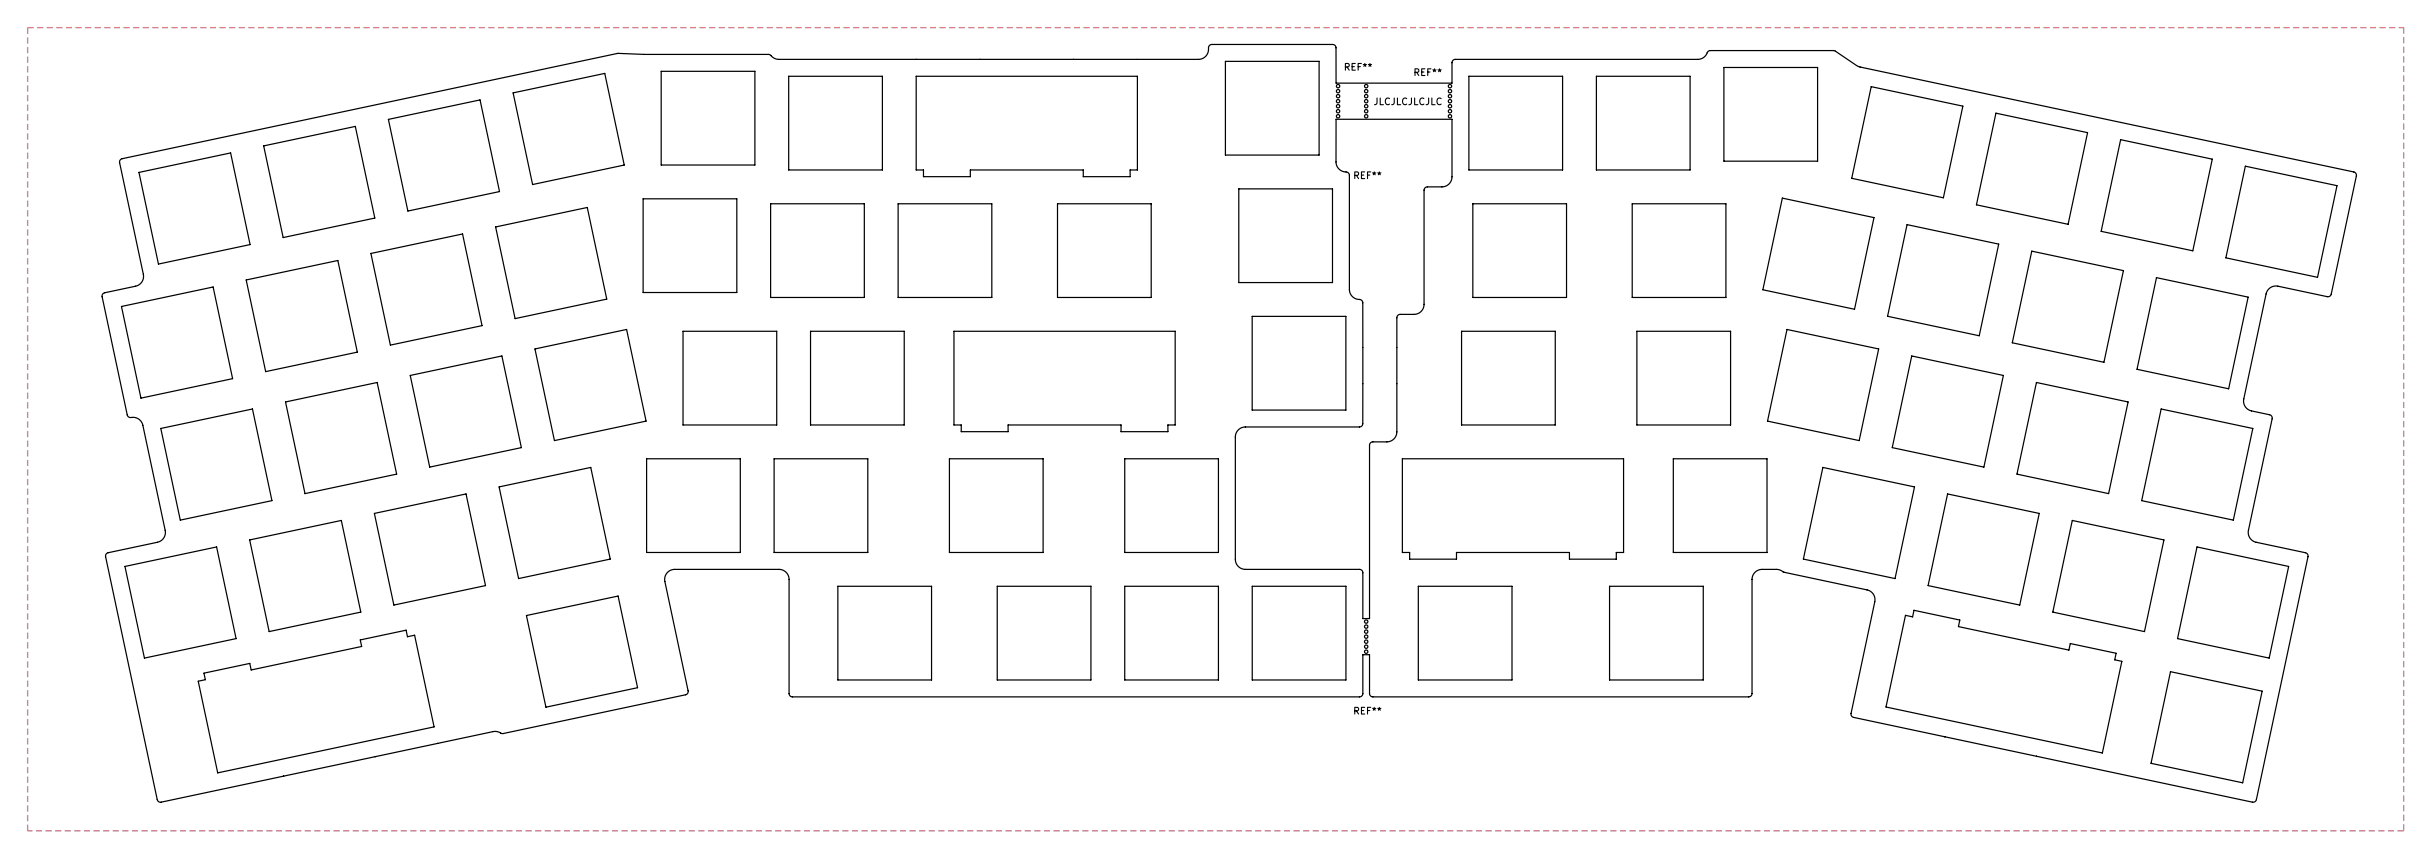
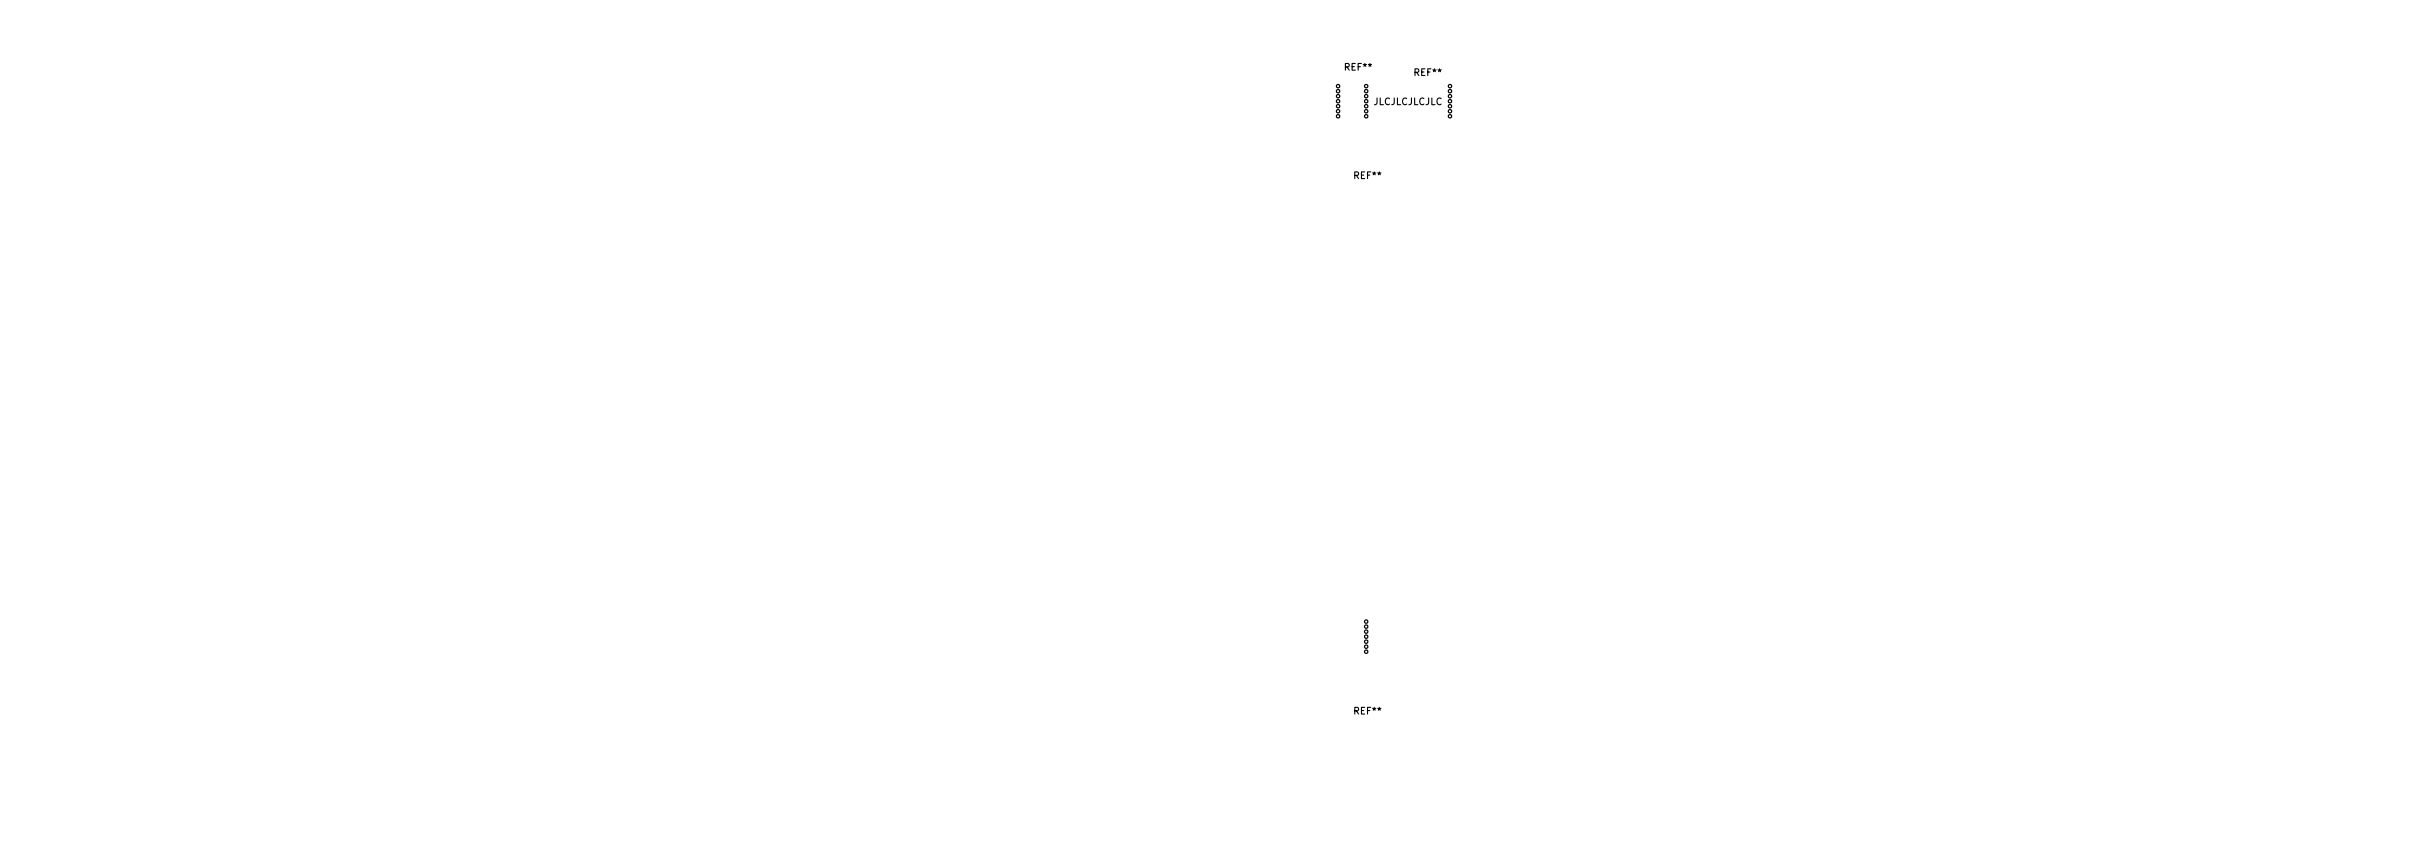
top zone outline: (27, 27) (27, 830) (2403, 830) (2403, 27) (27, 27) -> none
board edge: (1211, 44) (1333, 44) (1335, 47) (1336, 83) (1451, 83) (1452, 62) (1455, 59) (1697, 59) (1703, 57) (1709, 50) (1833, 50) (1860, 67) (2354, 172) (2356, 175) (2330, 294) (2327, 296) (2276, 286) (2268, 289) (2243, 399) (2244, 404) (2248, 409) (2269, 414) (2272, 417) (2248, 535) (2255, 541) (2305, 552) (2308, 555) (2255, 800) (2252, 802) (1852, 717) (1851, 713) (1874, 601) (1874, 595) (1867, 589) (1776, 569) (1759, 569) (1752, 576) (1752, 693) (1748, 696) (1372, 696) (1369, 693) (1369, 654) (1362, 654) (1362, 693) (1359, 696) (791, 696) (789, 693) (789, 579) (786, 572) (779, 569) (673, 569) (666, 573) (664, 580) (688, 690) (686, 694) (503, 733) (493, 731) (161, 802) (157, 800) (105, 556) (108, 552) (158, 541) (163, 537) (165, 532) (142, 424) (138, 418) (129, 417) (127, 414) (102, 296) (104, 292) (138, 285) (143, 278) (119, 162) (120, 159) (617, 53) (768, 54) (778, 59) (1198, 59) (1205, 56) (1208, 46) (1211, 44) -> none
board edge: (1225, 61) (1225, 155) (1319, 155) (1319, 61) (1225, 61) -> none
board edge: (1723, 67) (1723, 161) (1817, 161) (1817, 67) (1723, 67) -> none
board edge: (661, 71) (754, 71) (754, 165) (661, 165) (661, 71) -> none
board edge: (604, 73) (513, 92) (532, 184) (624, 165) (604, 73) -> none
board edge: (788, 76) (882, 76) (882, 169) (788, 169) (788, 76) -> none
board edge: (916, 76) (1137, 76) (1137, 169) (1130, 169) (1130, 176) (1083, 176) (1083, 169) (970, 169) (970, 176) (923, 176) (923, 169) (916, 169) (916, 76) -> none
board edge: (1468, 76) (1562, 76) (1562, 169) (1468, 169) (1468, 76) -> none
board edge: (1596, 76) (1690, 76) (1690, 169) (1596, 169) (1596, 76) -> none
board edge: (1871, 86) (1851, 178) (1943, 197) (1962, 106) (1871, 86) -> none
board edge: (480, 99) (388, 119) (407, 211) (499, 191) (480, 99) -> none
board edge: (1995, 113) (1976, 204) (2068, 224) (2087, 132) (1995, 113) -> none
board edge: (1336, 119) (1451, 119) (1451, 180) (1444, 186) (1426, 186) (1424, 189) (1423, 306) (1417, 313) (1399, 314) (1396, 317) (1396, 434) (1390, 441) (1372, 441) (1369, 444) (1369, 618) (1362, 618) (1362, 572) (1360, 569) (1244, 569) (1238, 566) (1235, 560) (1235, 437) (1238, 429) (1245, 426) (1359, 426) (1362, 424) (1362, 302) (1352, 296) (1349, 290) (1349, 174) (1339, 169) (1336, 164) (1336, 119) -> none
board edge: (355, 126) (263, 145) (283, 237) (374, 218) (355, 126) -> none
board edge: (2120, 139) (2101, 231) (2192, 250) (2212, 159) (2120, 139) -> none
board edge: (230, 152) (138, 172) (158, 264) (250, 244) (230, 152) -> none
board edge: (2245, 166) (2337, 185) (2317, 277) (2225, 257) (2245, 166) -> none
board edge: (1238, 188) (1238, 282) (1332, 282) (1332, 188) (1238, 188) -> none
board edge: (643, 198) (643, 292) (736, 292) (736, 198) (643, 198) -> none
board edge: (1782, 198) (1873, 217) (1854, 309) (1762, 289) (1782, 198) -> none
board edge: (770, 203) (770, 297) (864, 297) (864, 203) (770, 203) -> none
board edge: (898, 203) (991, 203) (991, 297) (898, 297) (898, 203) -> none
board edge: (1057, 203) (1151, 203) (1151, 297) (1057, 297) (1057, 203) -> none
board edge: (1472, 203) (1472, 297) (1566, 297) (1566, 203) (1472, 203) -> none
board edge: (1632, 203) (1725, 203) (1725, 297) (1632, 297) (1632, 203) -> none
board edge: (587, 207) (606, 299) (515, 318) (495, 226) (587, 207) -> none
board edge: (1907, 224) (1998, 244) (1979, 335) (1887, 316) (1907, 224) -> none
board edge: (462, 233) (370, 253) (390, 345) (482, 325) (462, 233) -> none
board edge: (2031, 251) (2123, 270) (2103, 362) (2012, 342) (2031, 251) -> none
board edge: (337, 260) (246, 279) (265, 371) (357, 352) (337, 260) -> none
board edge: (2156, 277) (2248, 297) (2228, 388) (2137, 369) (2156, 277) -> none
board edge: (213, 287) (232, 378) (140, 398) (121, 306) (213, 287) -> none
board edge: (1252, 316) (1345, 316) (1345, 410) (1252, 410) (1252, 316) -> none
board edge: (626, 329) (534, 348) (554, 440) (646, 421) (626, 329) -> none
board edge: (1787, 329) (1878, 348) (1859, 440) (1767, 421) (1787, 329) -> none
board edge: (683, 331) (776, 331) (776, 424) (683, 424) (683, 331) -> none
board edge: (810, 331) (810, 424) (904, 424) (904, 331) (810, 331) -> none
board edge: (953, 331) (1175, 331) (1175, 424) (1167, 424) (1167, 431) (1121, 431) (1121, 424) (1008, 424) (1008, 431) (961, 431) (961, 424) (953, 424) (953, 331) -> none
board edge: (1461, 331) (1461, 424) (1555, 424) (1555, 331) (1461, 331) -> none
board edge: (1636, 331) (1730, 331) (1730, 424) (1636, 424) (1636, 331) -> none
board edge: (501, 355) (410, 375) (429, 467) (521, 447) (501, 355) -> none
board edge: (1911, 355) (2003, 375) (1983, 467) (1892, 447) (1911, 355) -> none
board edge: (377, 382) (285, 401) (305, 493) (396, 474) (377, 382) -> none
board edge: (2036, 382) (2128, 401) (2108, 493) (2016, 474) (2036, 382) -> none
board edge: (252, 408) (160, 428) (180, 520) (271, 500) (252, 408) -> none
board edge: (2161, 408) (2252, 428) (2233, 520) (2141, 500) (2161, 408) -> none
board edge: (646, 458) (646, 552) (740, 552) (740, 458) (646, 458) -> none
board edge: (774, 458) (867, 458) (867, 552) (774, 552) (774, 458) -> none
board edge: (949, 458) (1043, 458) (1043, 552) (949, 552) (949, 458) -> none
board edge: (1124, 458) (1124, 552) (1218, 552) (1218, 458) (1124, 458) -> none
board edge: (1402, 458) (1402, 552) (1409, 552) (1409, 559) (1456, 559) (1456, 552) (1569, 552) (1569, 559) (1616, 559) (1616, 552) (1623, 552) (1623, 458) (1402, 458) -> none
board edge: (1673, 458) (1767, 458) (1767, 552) (1673, 552) (1673, 458) -> none
board edge: (590, 467) (610, 559) (518, 578) (499, 486) (590, 467) -> none
board edge: (1822, 467) (1914, 486) (1895, 578) (1803, 559) (1822, 467) -> none
board edge: (466, 493) (374, 513) (393, 605) (485, 585) (466, 493) -> none
board edge: (1947, 493) (2039, 513) (2019, 605) (1928, 585) (1947, 493) -> none
board edge: (341, 520) (249, 539) (269, 631) (360, 612) (341, 520) -> none
board edge: (2072, 520) (2052, 612) (2144, 631) (2163, 539) (2072, 520) -> none
board edge: (216, 546) (124, 566) (144, 658) (236, 638) (216, 546) -> none
board edge: (2197, 546) (2177, 638) (2269, 658) (2288, 566) (2197, 546) -> none
board edge: (837, 586) (931, 586) (931, 679) (837, 679) (837, 586) -> none
board edge: (997, 586) (1090, 586) (1090, 679) (997, 679) (997, 586) -> none
board edge: (1124, 586) (1124, 679) (1218, 679) (1218, 586) (1124, 586) -> none
board edge: (1252, 586) (1345, 586) (1345, 679) (1252, 679) (1252, 586) -> none
board edge: (1418, 586) (1512, 586) (1512, 679) (1418, 679) (1418, 586) -> none
board edge: (1609, 586) (1703, 586) (1703, 679) (1609, 679) (1609, 586) -> none
board edge: (618, 596) (637, 687) (545, 707) (526, 615) (618, 596) -> none
board edge: (1913, 610) (1912, 616) (1905, 615) (1885, 706) (2102, 752) (2121, 661) (2114, 659) (2116, 653) (2070, 643) (2068, 650) (1958, 626) (1959, 620) (1913, 610) -> none
board edge: (406, 630) (407, 636) (414, 635) (434, 726) (217, 772) (198, 681) (205, 679) (203, 673) (249, 663) (251, 669) (361, 646) (360, 639) (406, 630) -> none
board edge: (2170, 671) (2262, 691) (2242, 782) (2151, 763) (2170, 671) -> none

